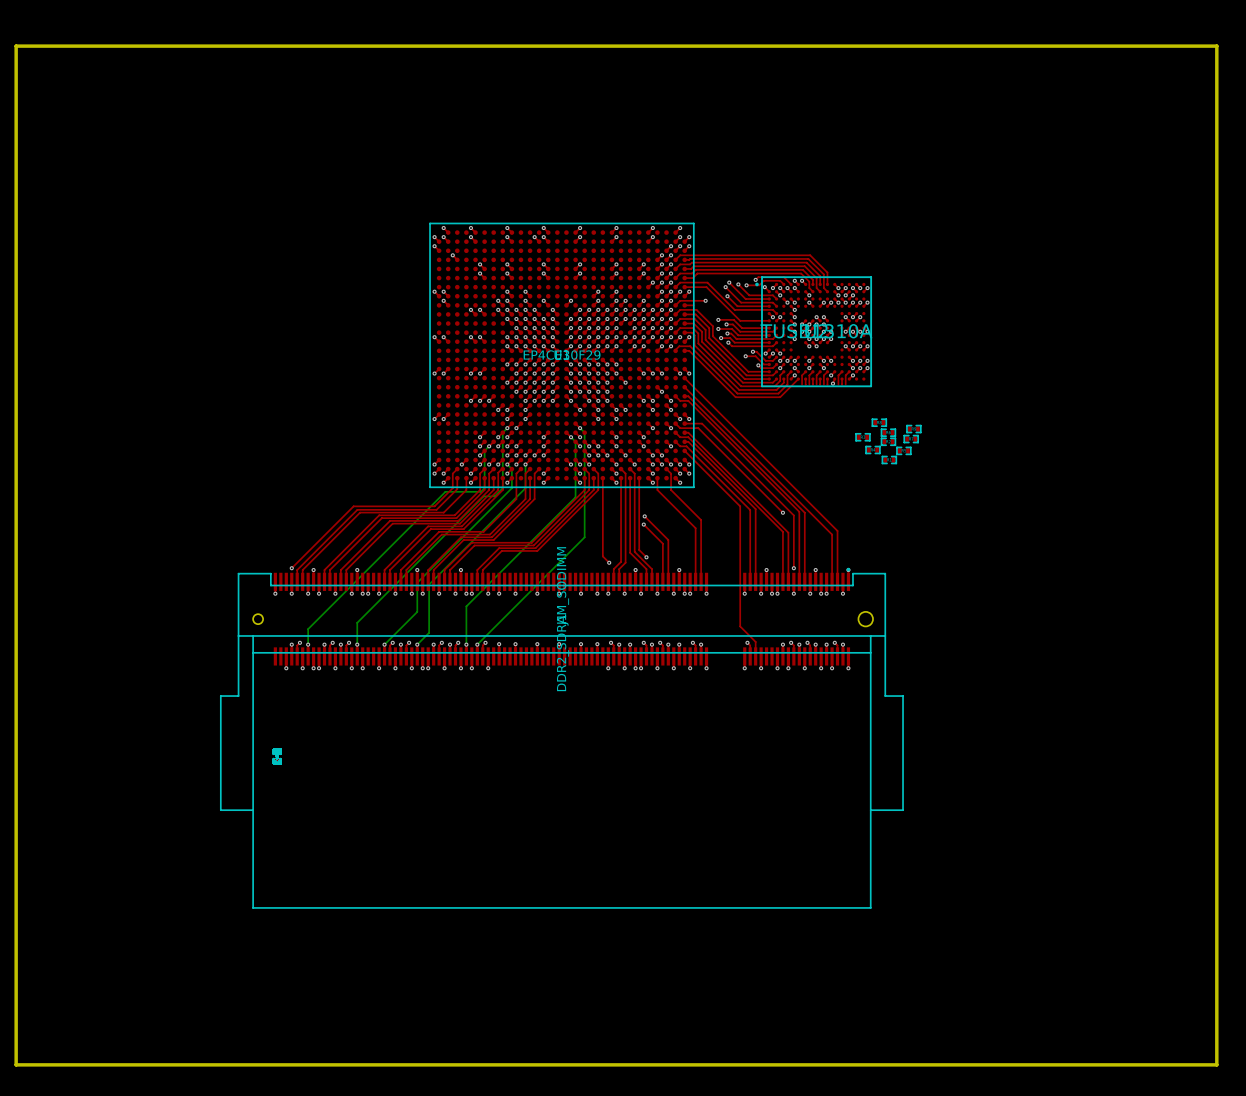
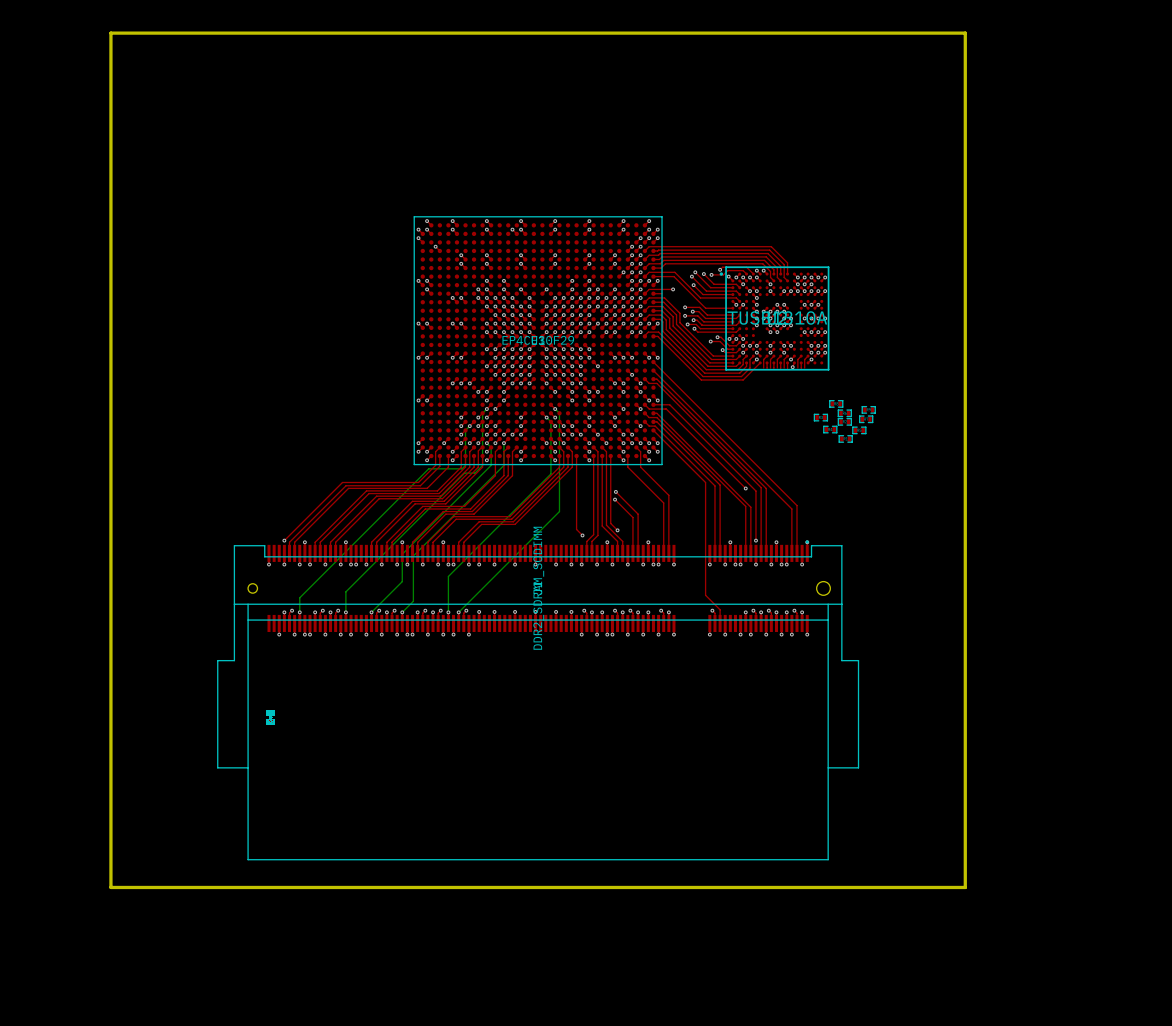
board edge: (16, 46) (16, 1064) (1216, 1064) (1216, 46) (16, 46) -> (110, 33) (110, 887) (965, 887) (965, 33) (110, 33)

